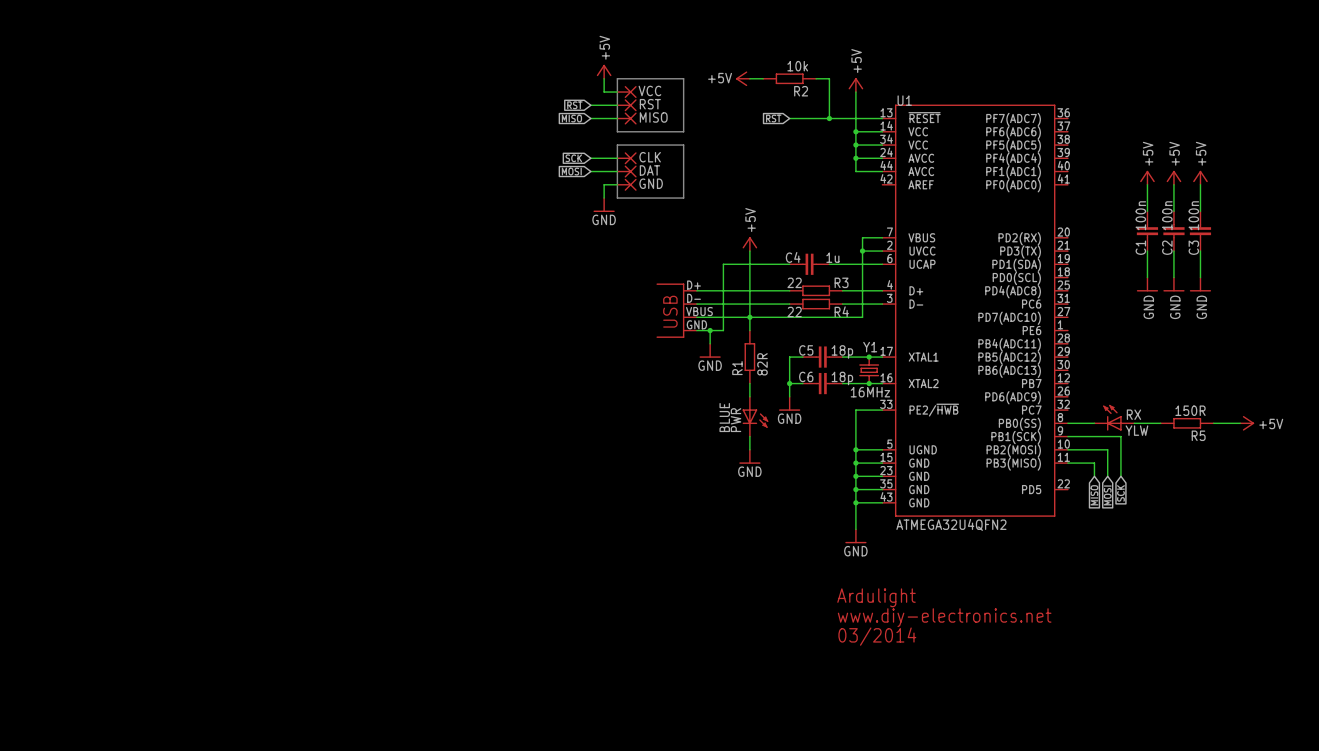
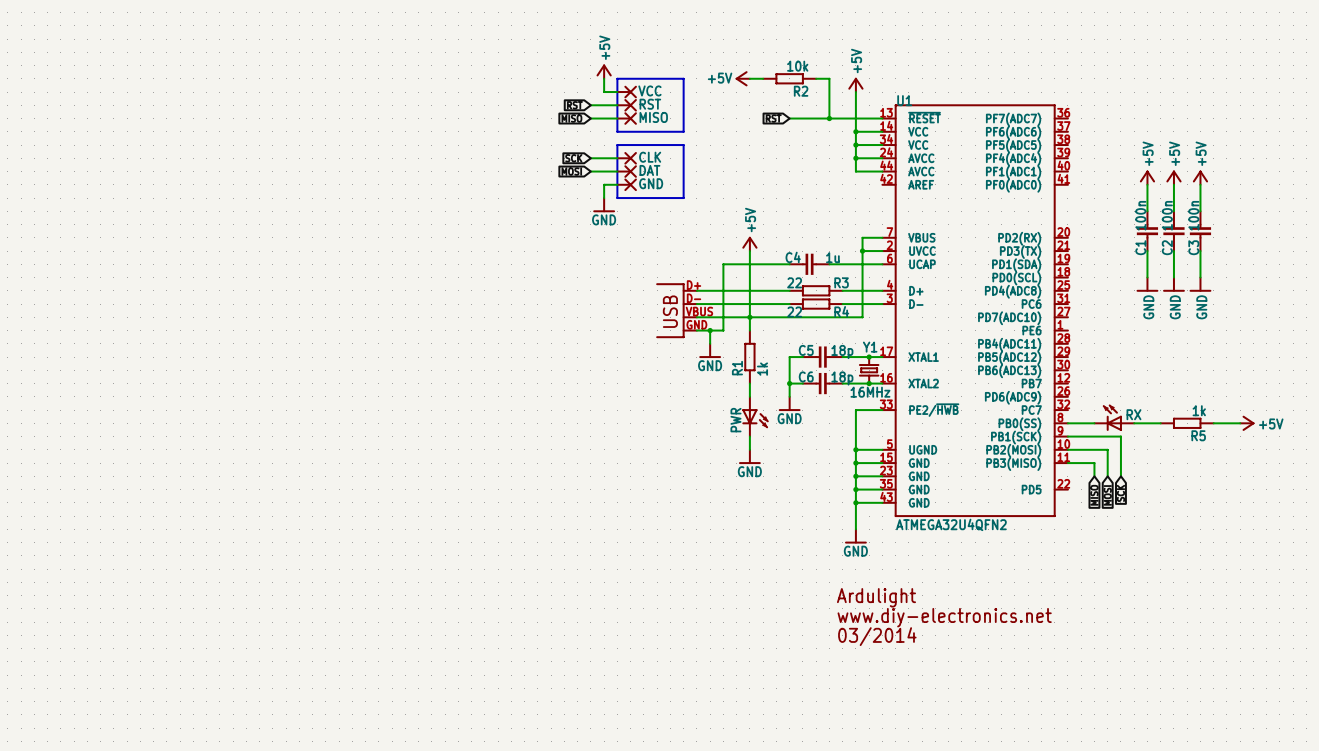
R1 value: 82R (762, 364) -> 1k (762, 369)
R5 value: 150R (1190, 410) -> 1k (1199, 410)
PWR value: BLUE (724, 417) -> none
RX value: YLW (1136, 430) -> none

